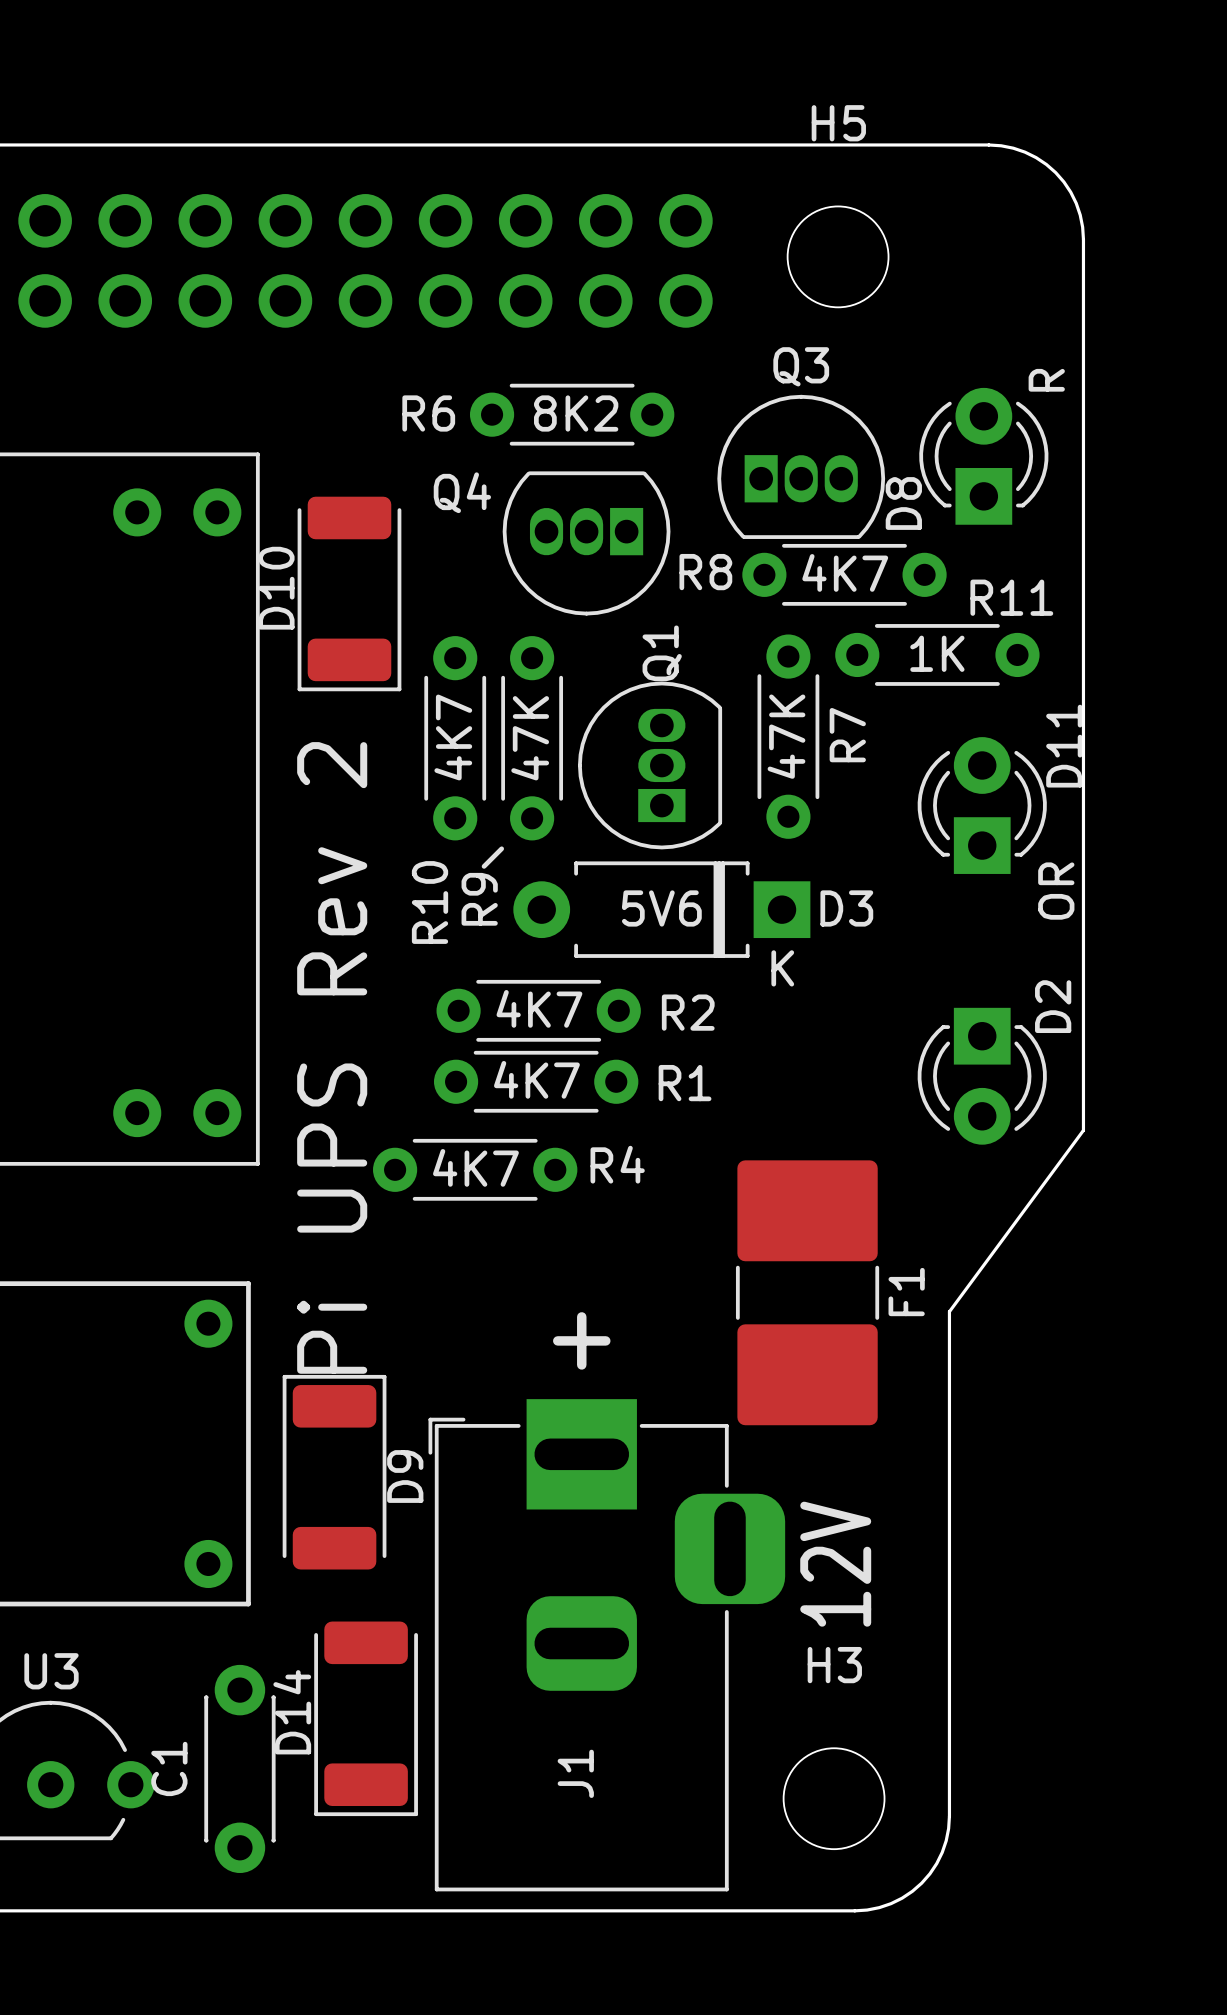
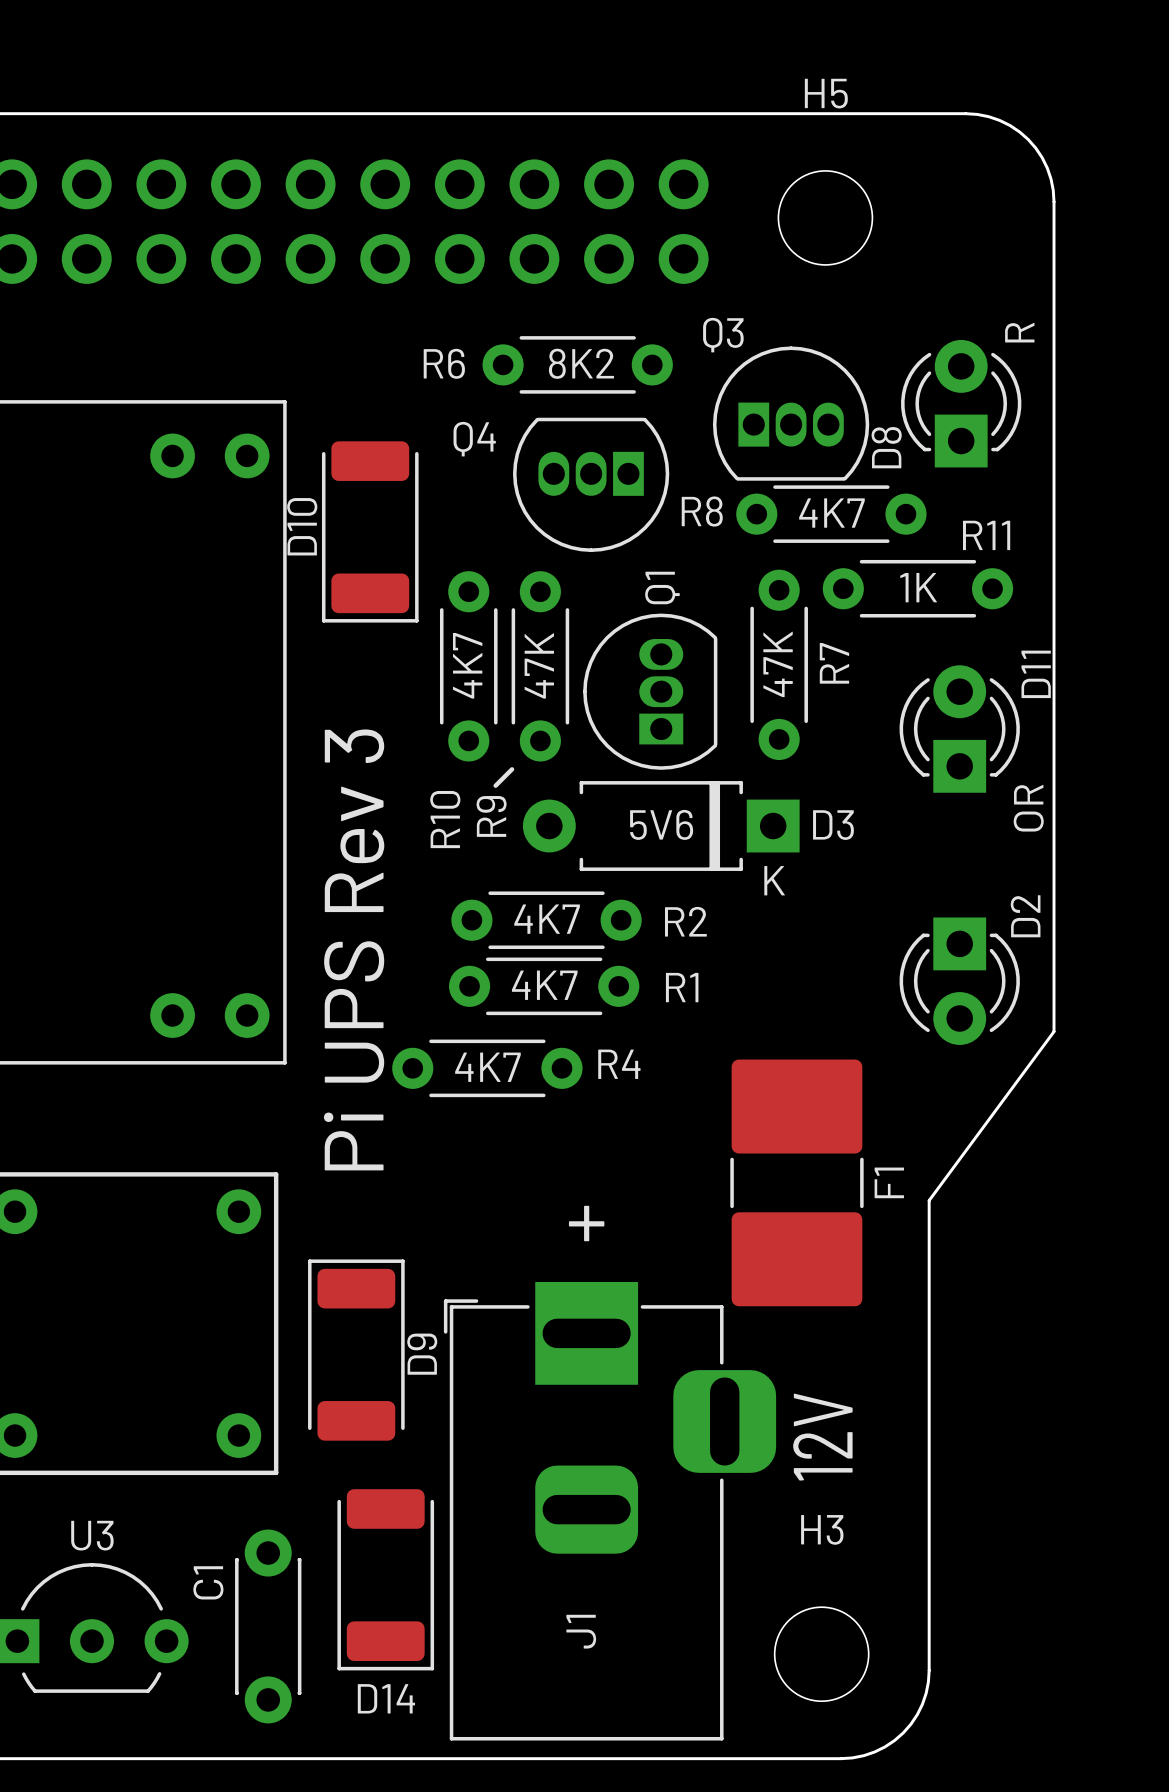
Q3 name position: Q3 (801, 366) -> Q3 (723, 335)
text: Pi UPS Rev 2 (332, 1057) -> Pi UPS Rev 3 (354, 949)
D14 name rotation: 0° (292, 1712) -> 90° clockwise (386, 1698)
D14 name position: D14 (292, 1712) -> D14 (386, 1698)
C1 name position: C1 (169, 1768) -> C1 (208, 1582)

